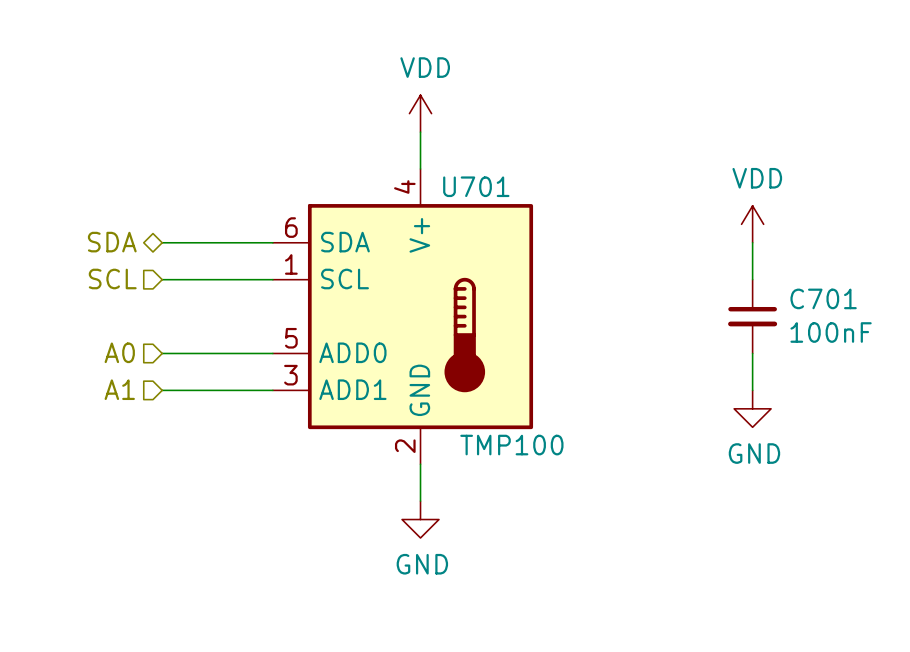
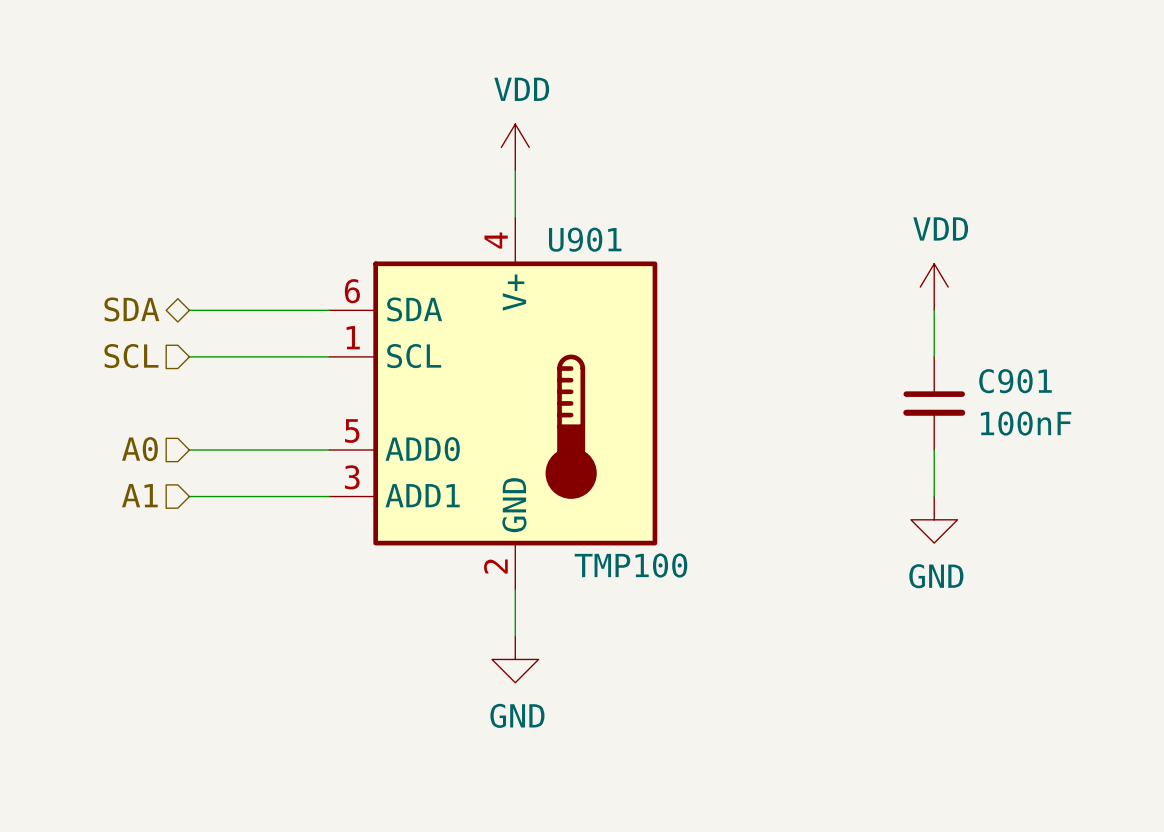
U701 name: U701 (476, 186) -> U901 (585, 239)
C701 name: C701 (823, 298) -> C901 (1015, 381)

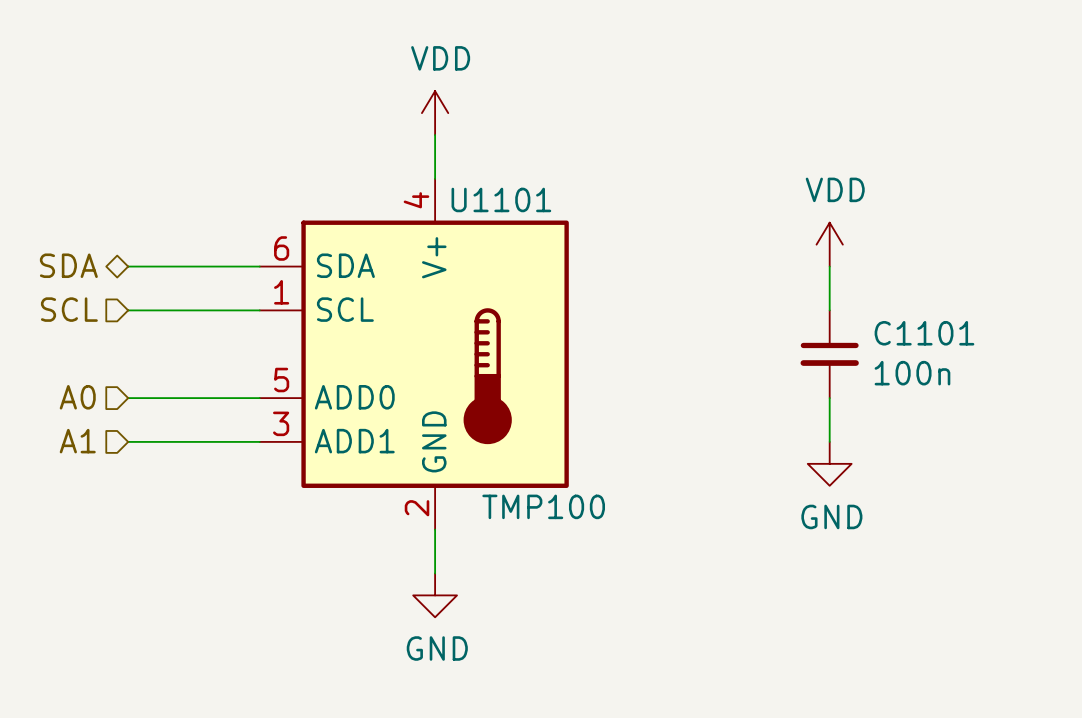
U901 name: U901 (585, 239) -> U1101 (501, 199)
C901 name: C901 (1015, 381) -> C1101 (924, 333)
C901 value: 100nF (1026, 423) -> 100n (912, 373)

